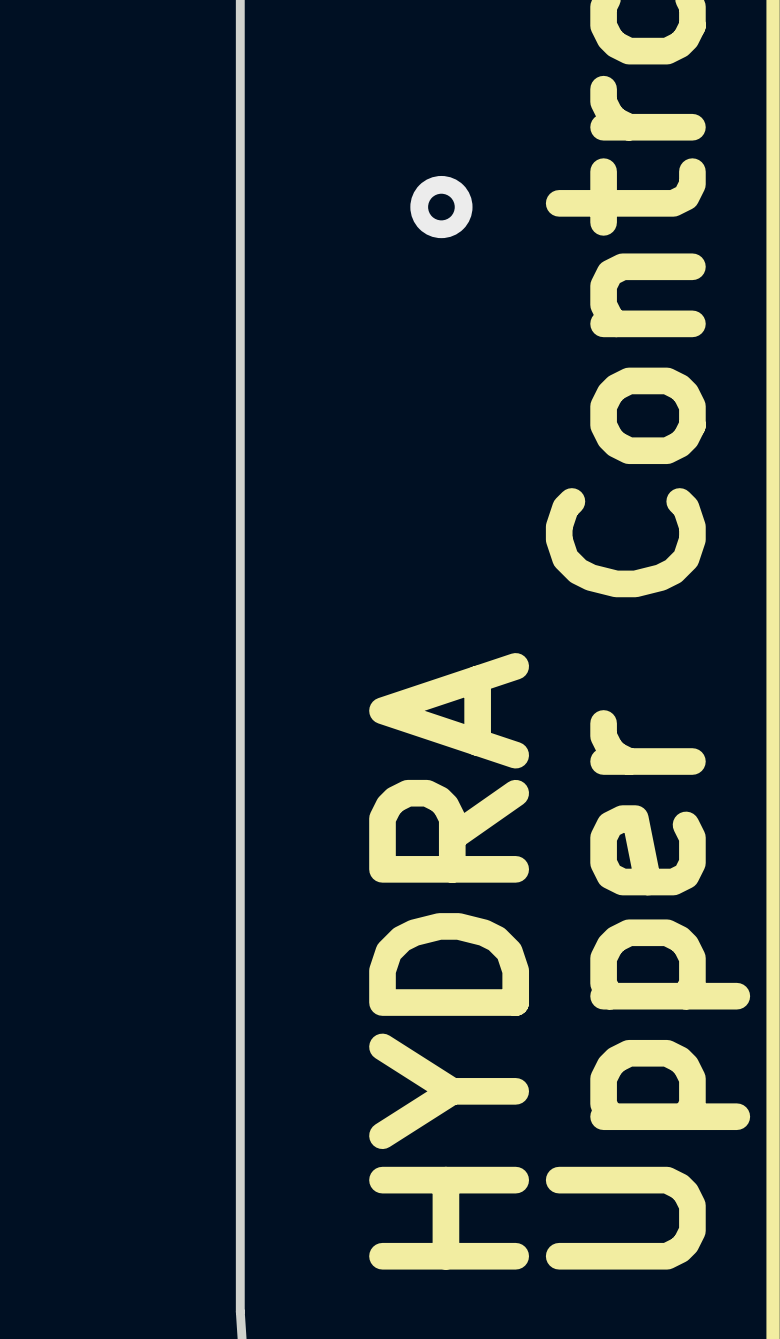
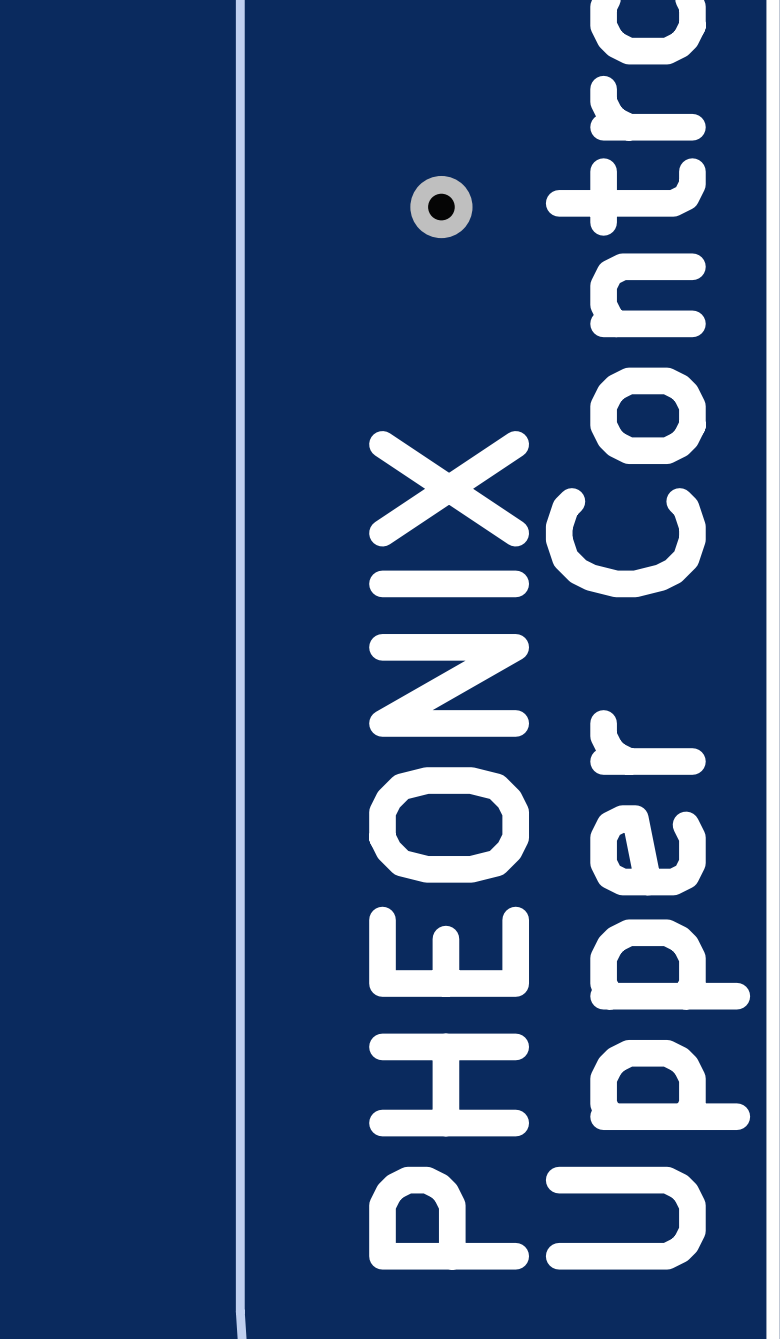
text: HYDRA (449, 961) -> PHEONIX (449, 850)

